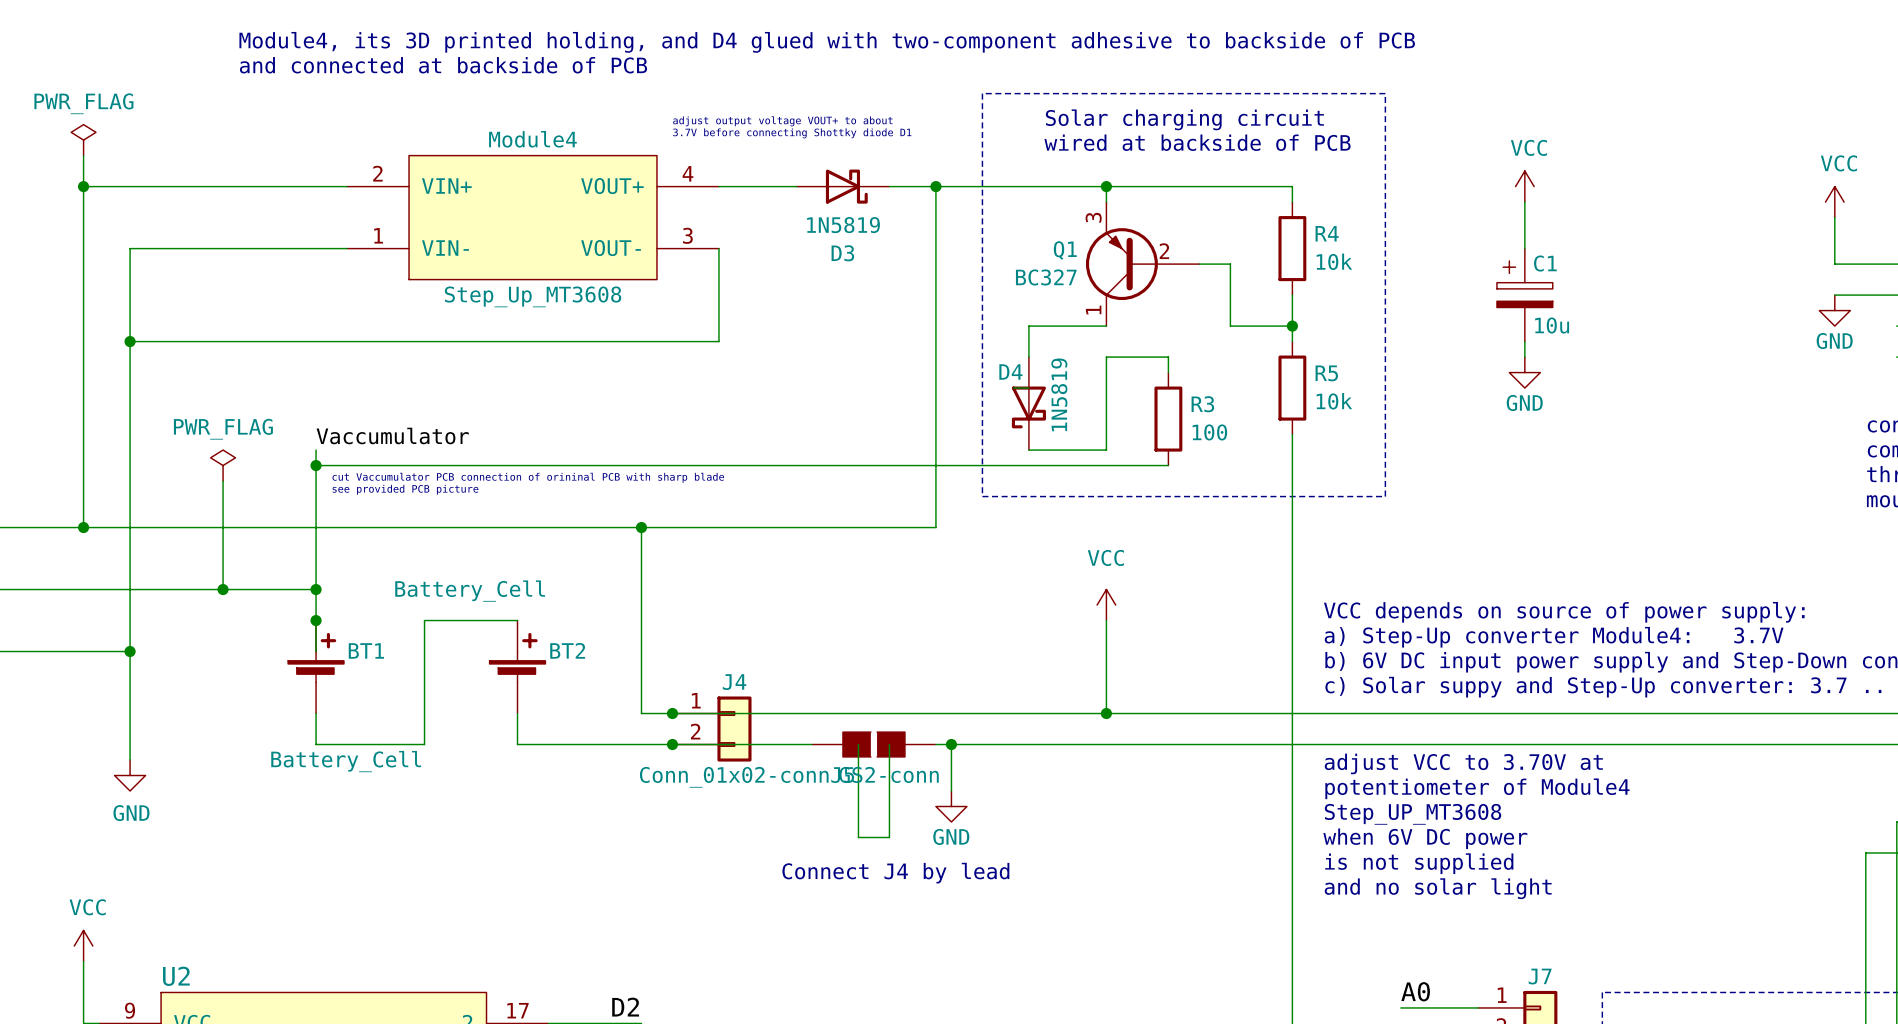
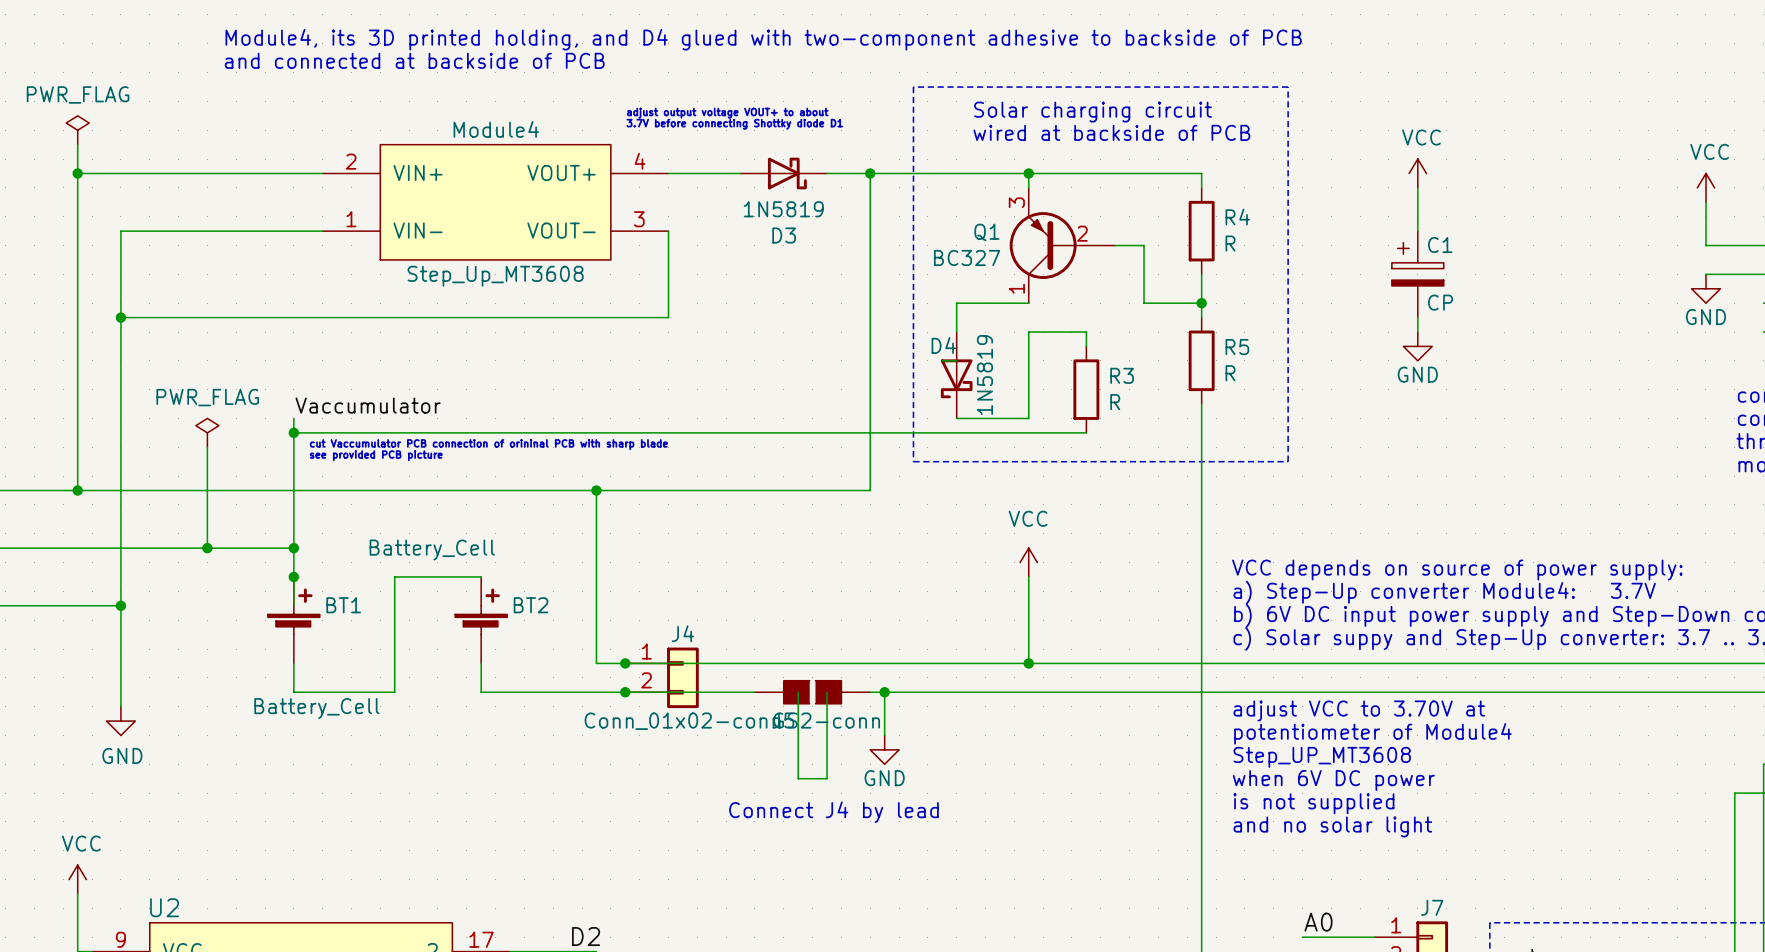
R4 value: 10k (1334, 261) -> R (1230, 243)
C1 value: 10u (1552, 325) -> CP (1440, 302)
R5 value: 10k (1334, 401) -> R (1230, 373)
R3 value: 100 (1209, 432) -> R (1115, 402)

